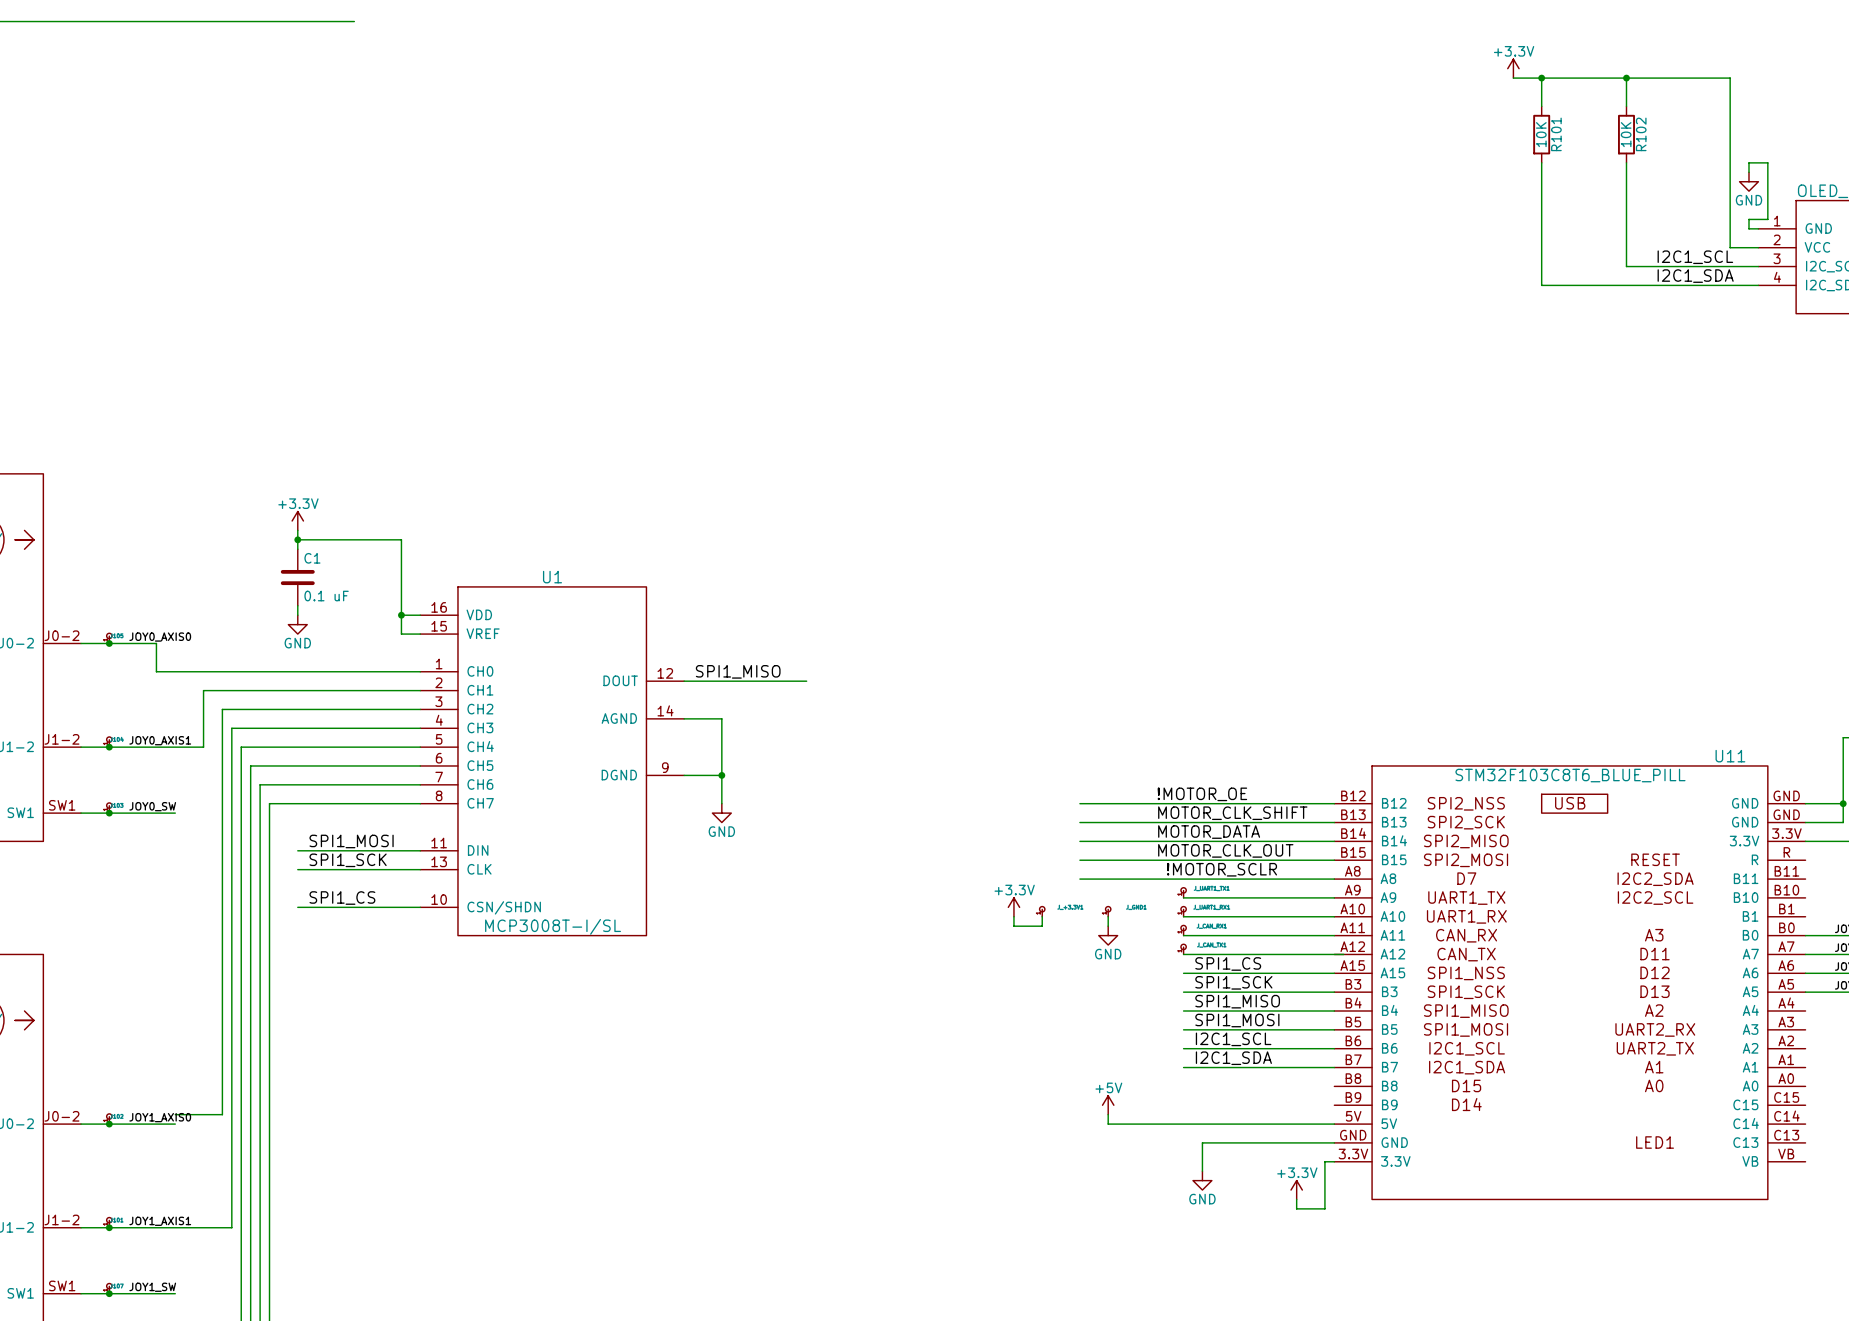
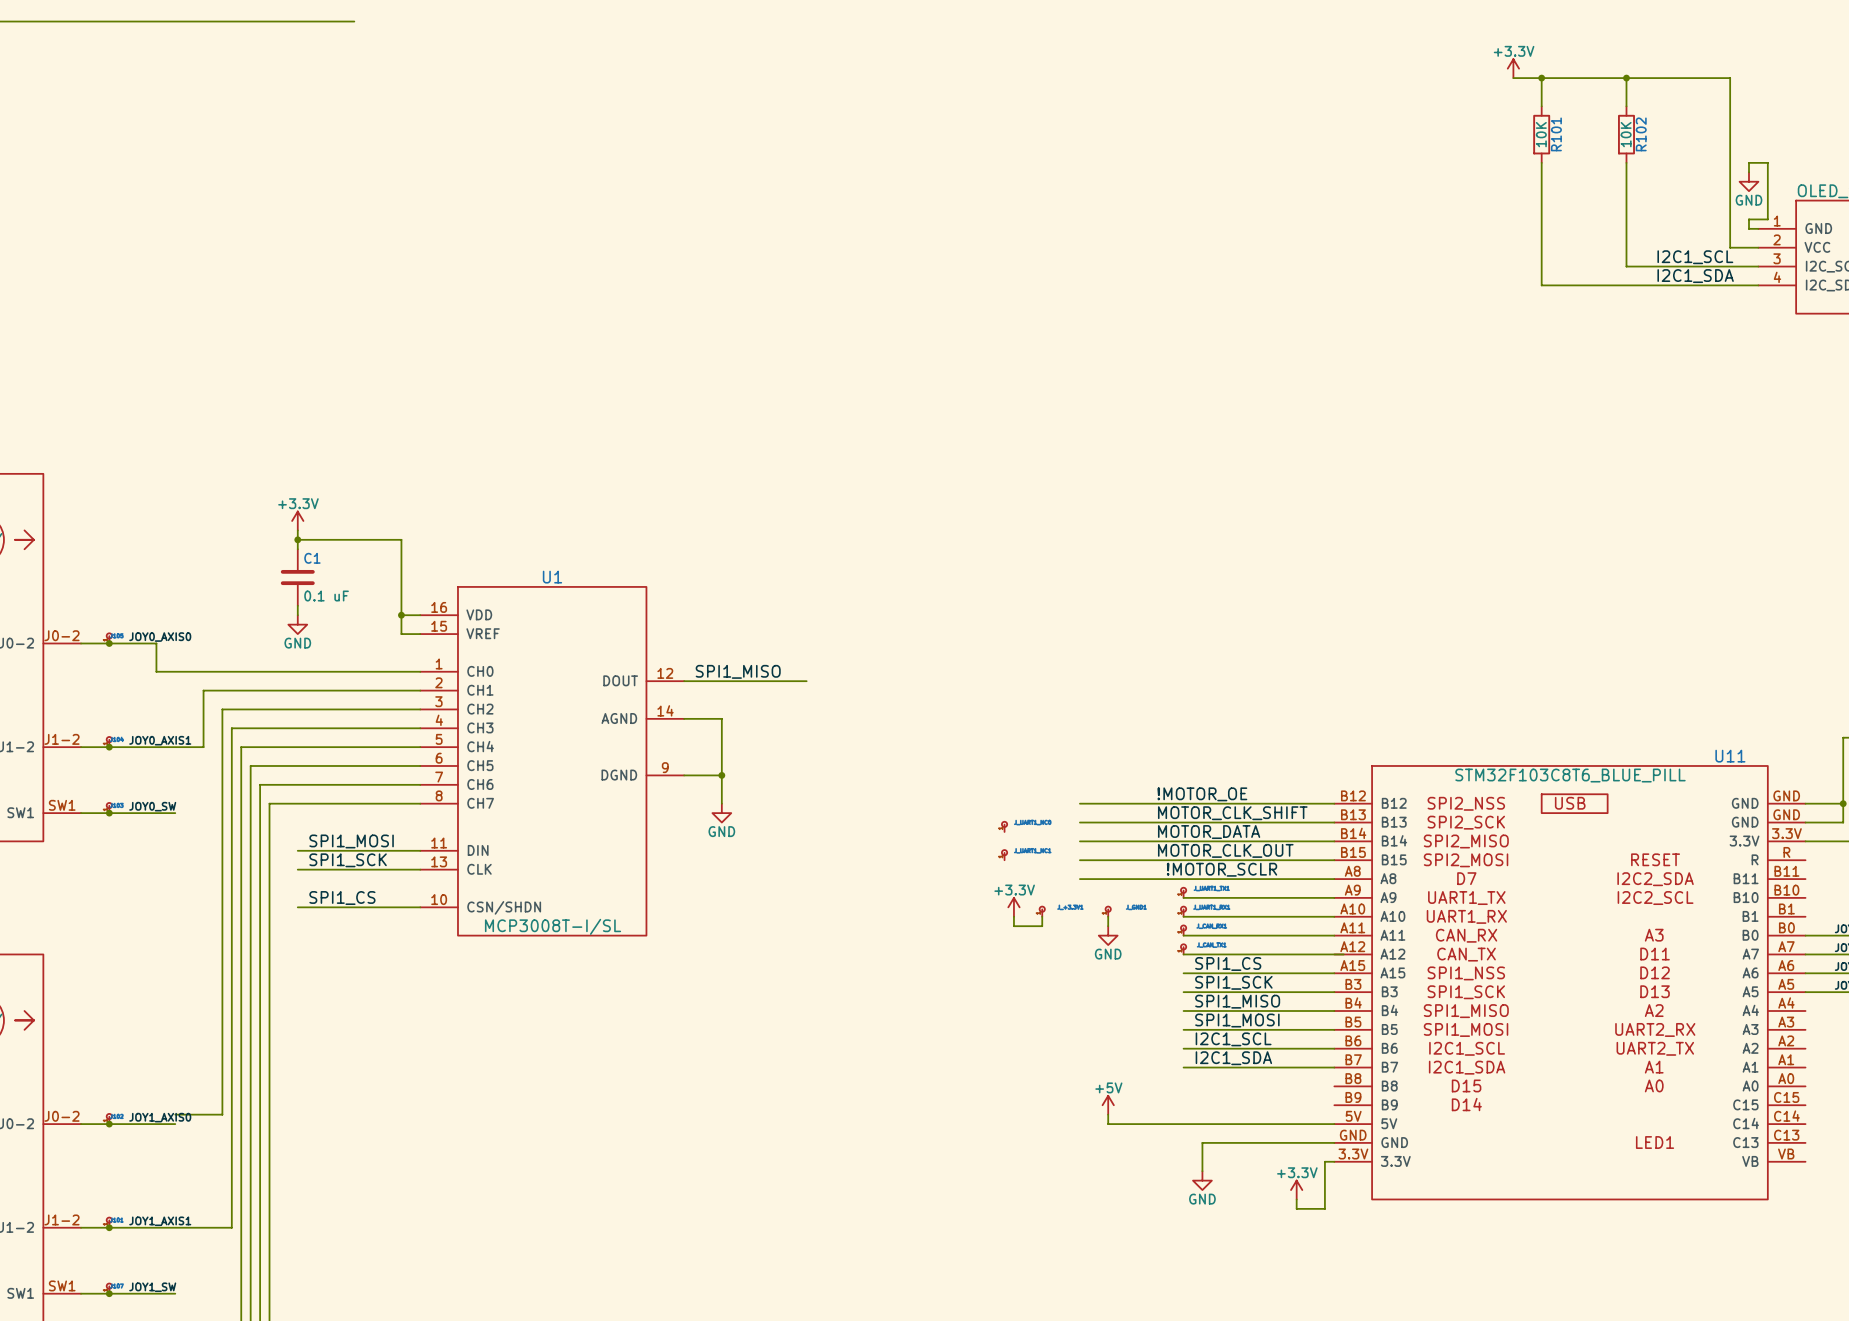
part: none -> (1004, 826)
part: none -> (1004, 855)

